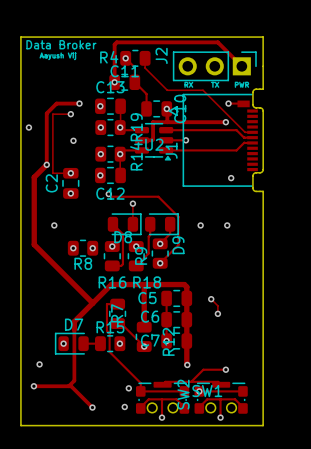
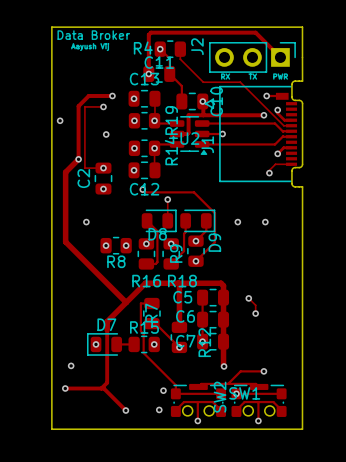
track: none -> (277, 110) (277, 113) (284, 120) (291, 120)
via: none -> (277, 110)
track: none -> (291, 147) (283, 147) (277, 153)
via: none -> (277, 153)
track: none -> (291, 164) (275, 164) (266, 173)

